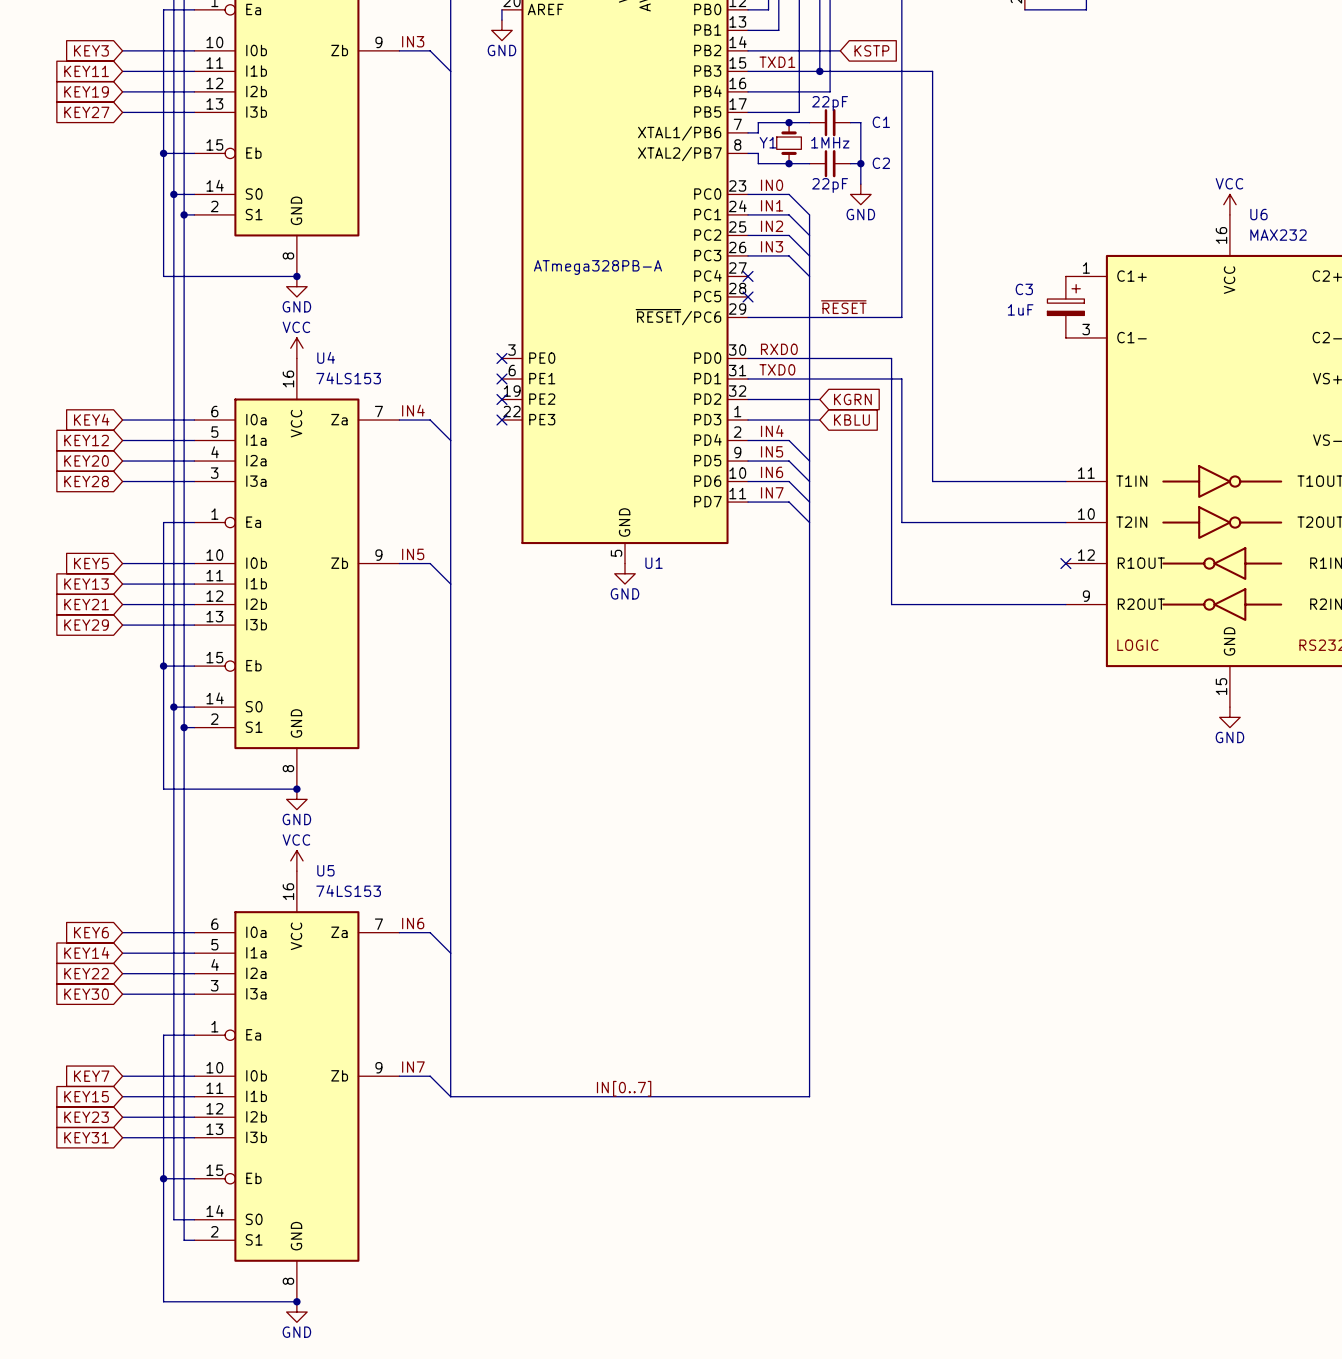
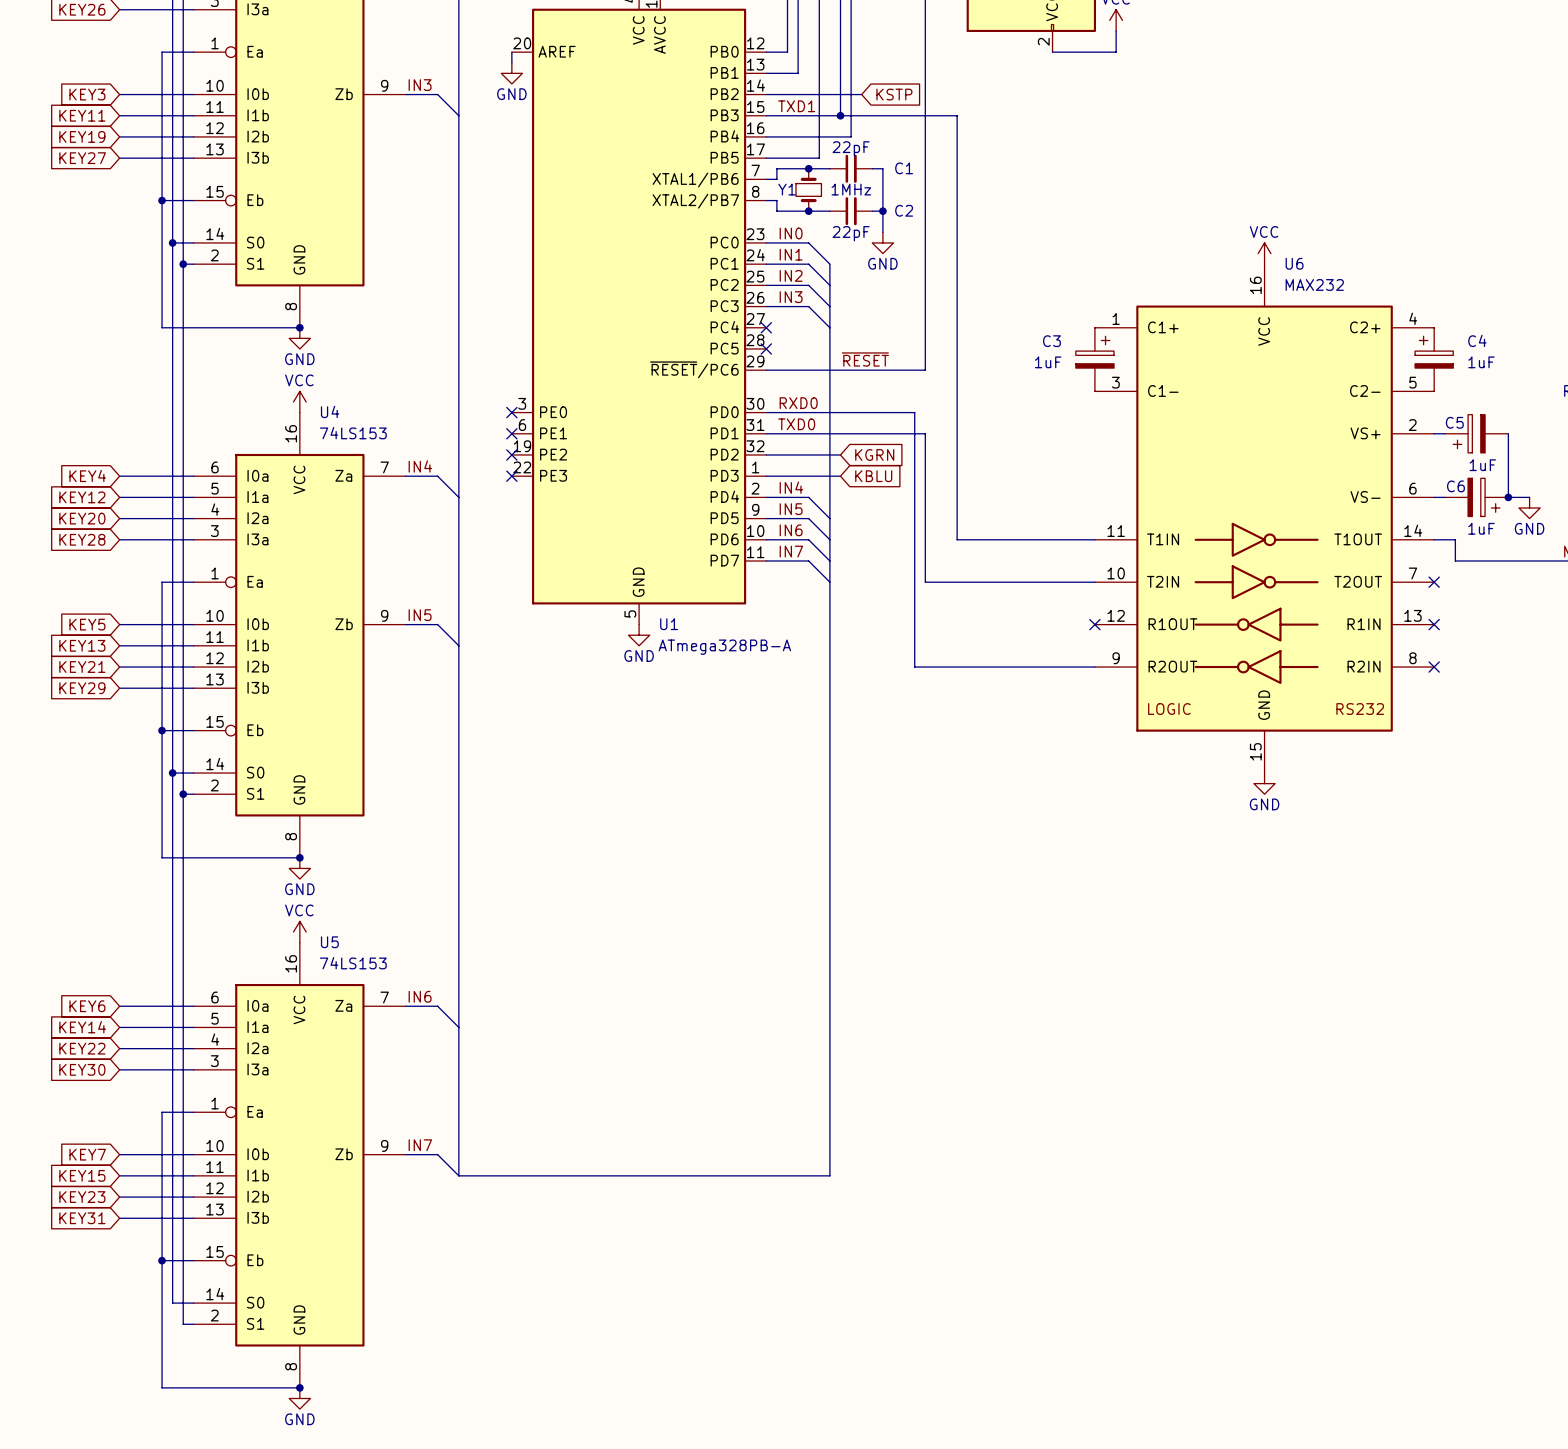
U1 value position: ATmega328PB-A (597, 267) -> ATmega328PB-A (724, 647)
label: IN[0..7] (624, 1088) -> none

